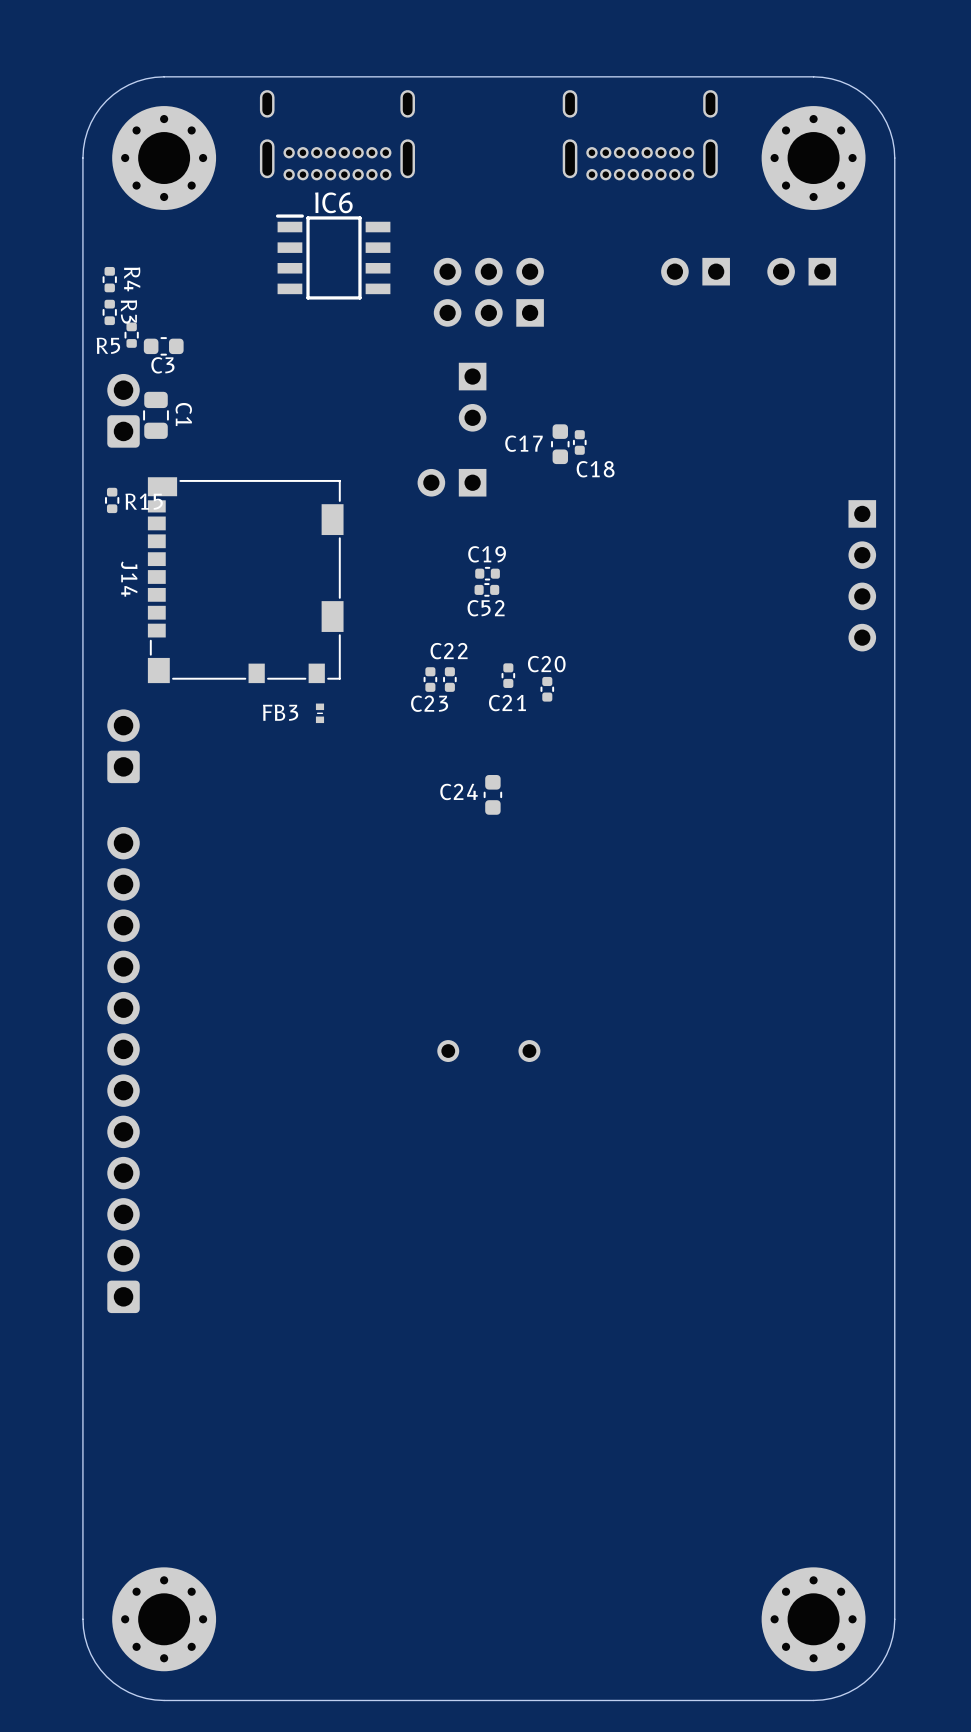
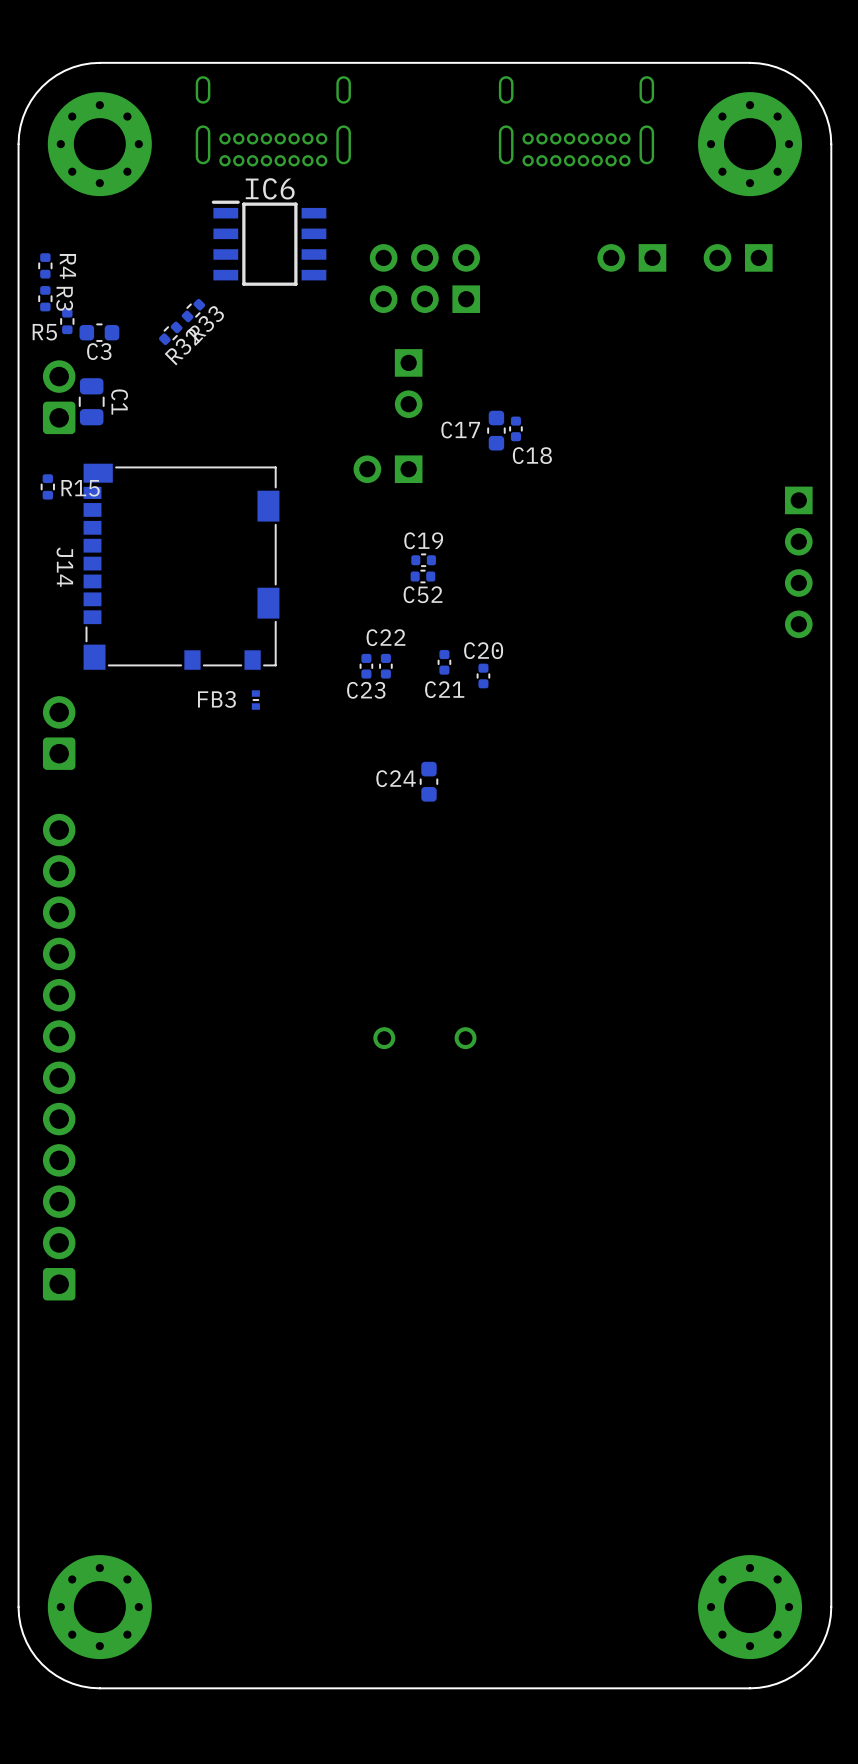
R33: none -> (193, 310)
R32: none -> (170, 333)

